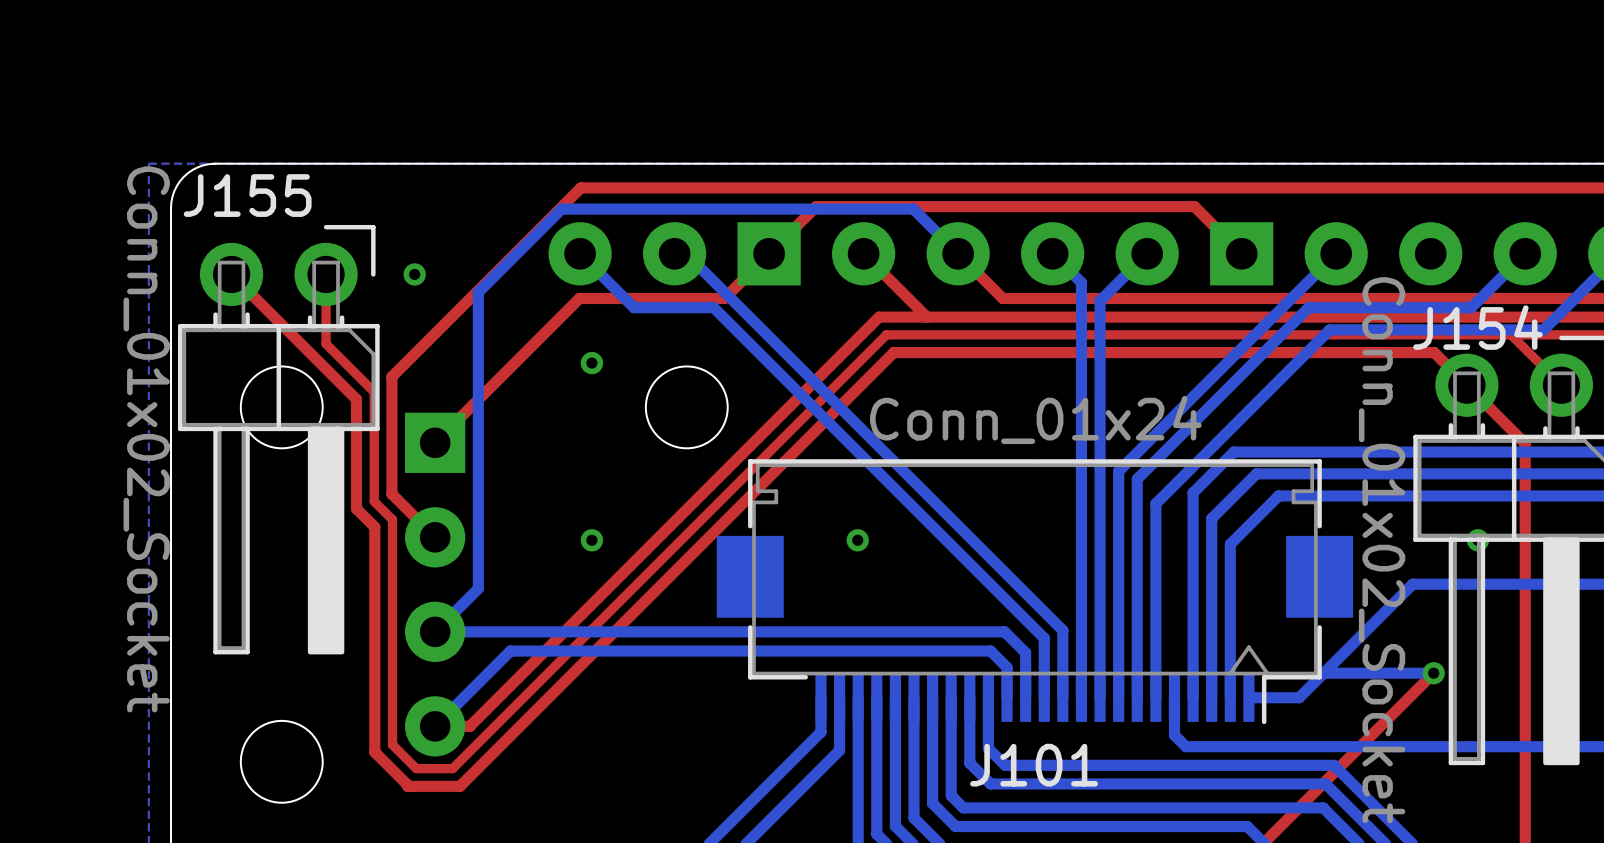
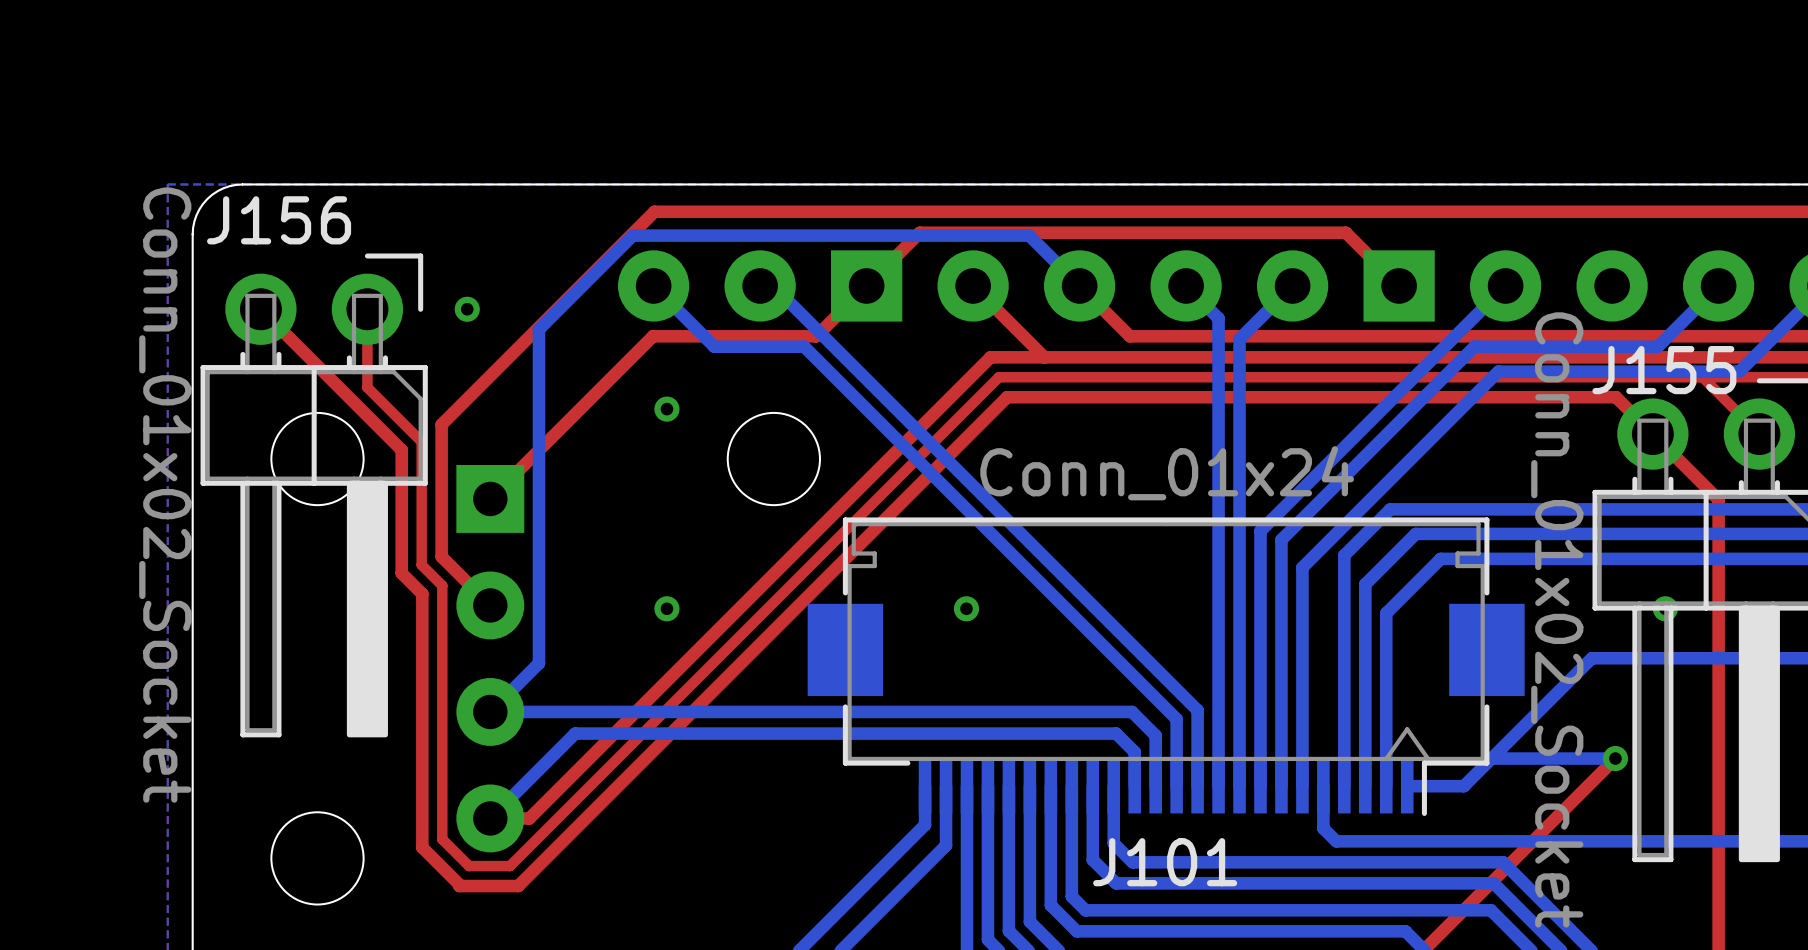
J155 name: J155 (247, 195) -> J156 (279, 220)
J154 name: J154 (1477, 327) -> J155 (1664, 370)

